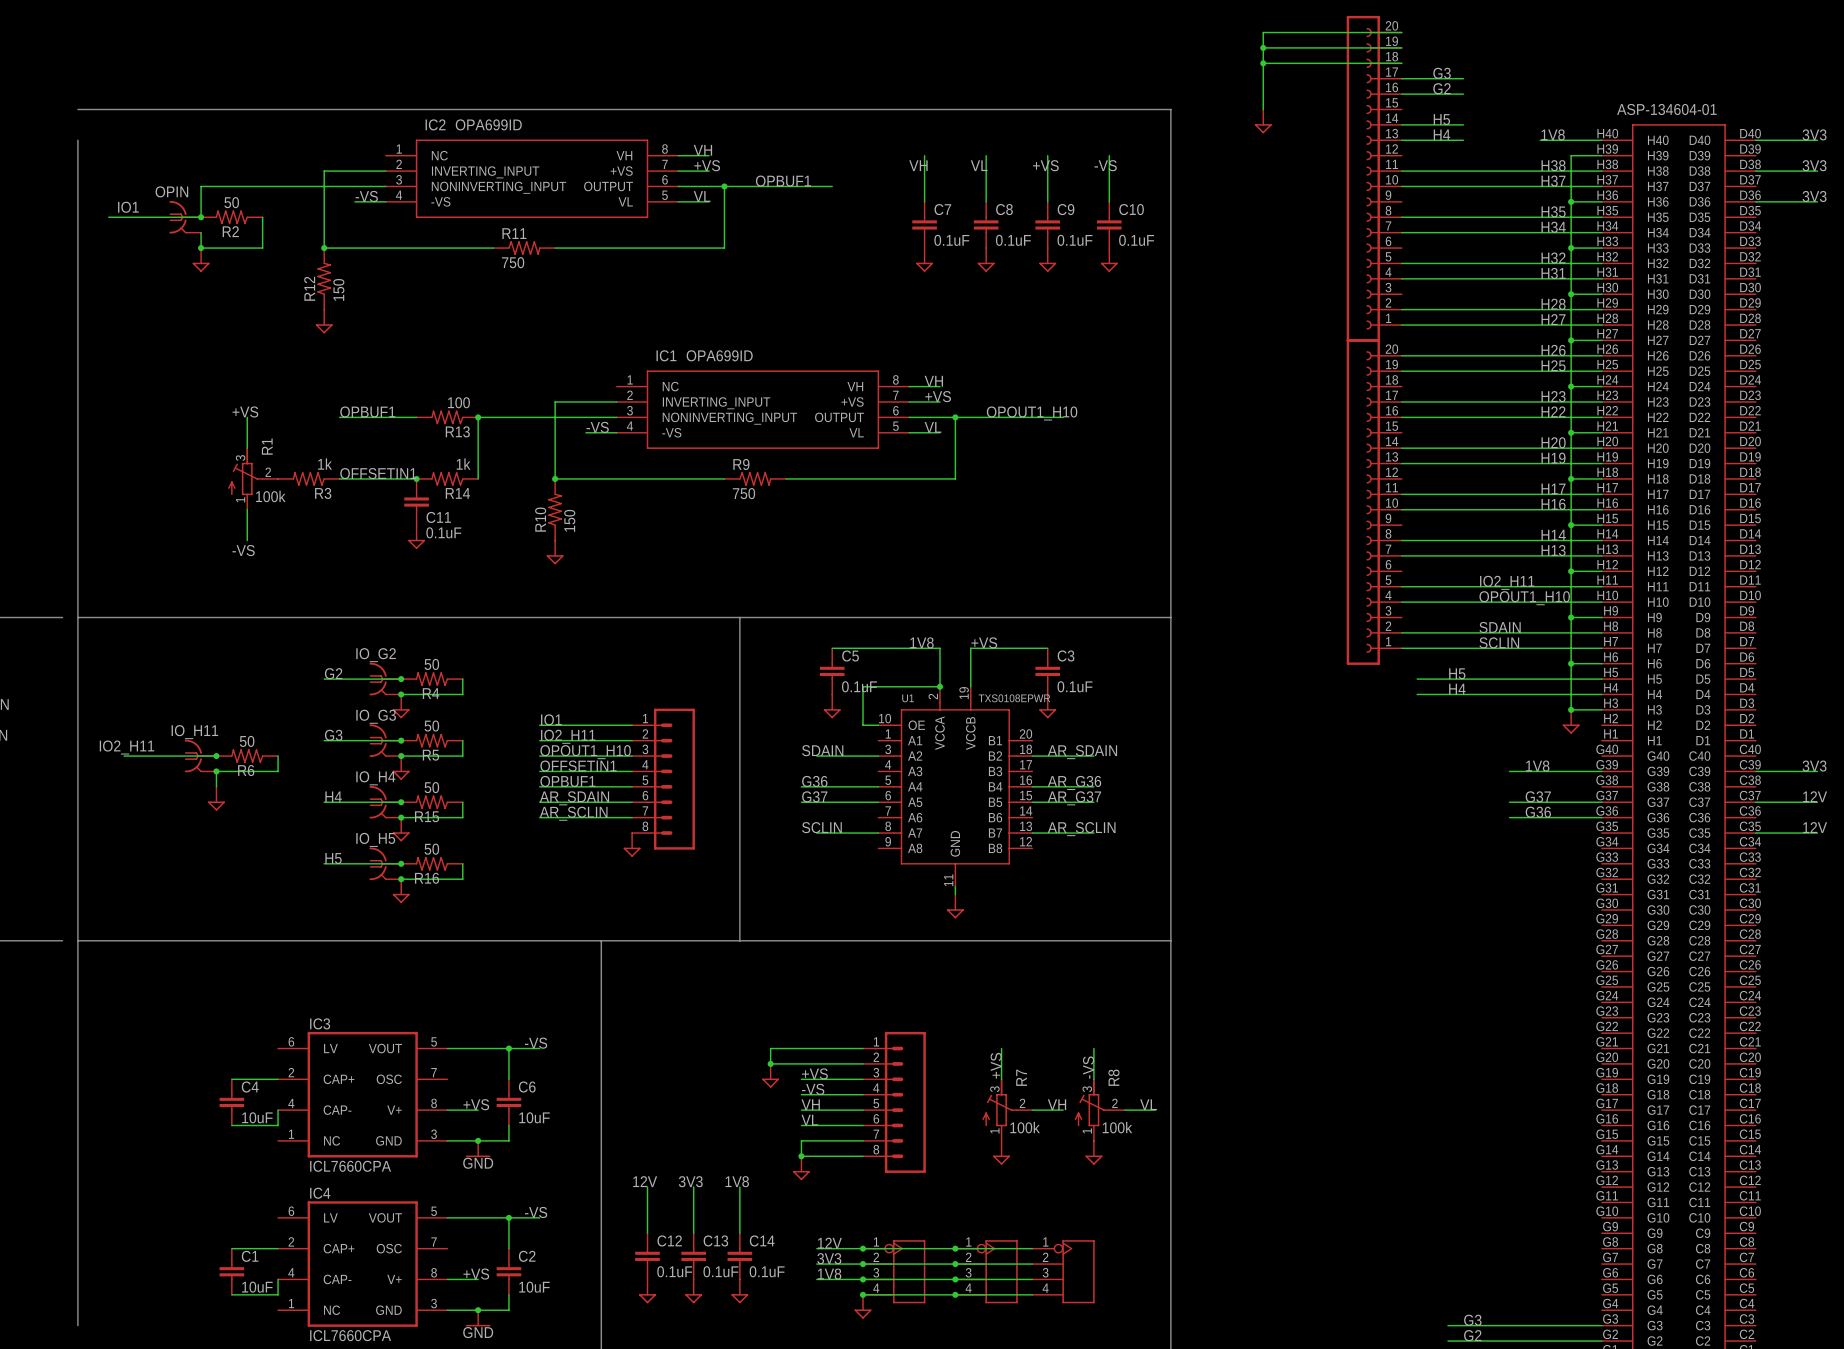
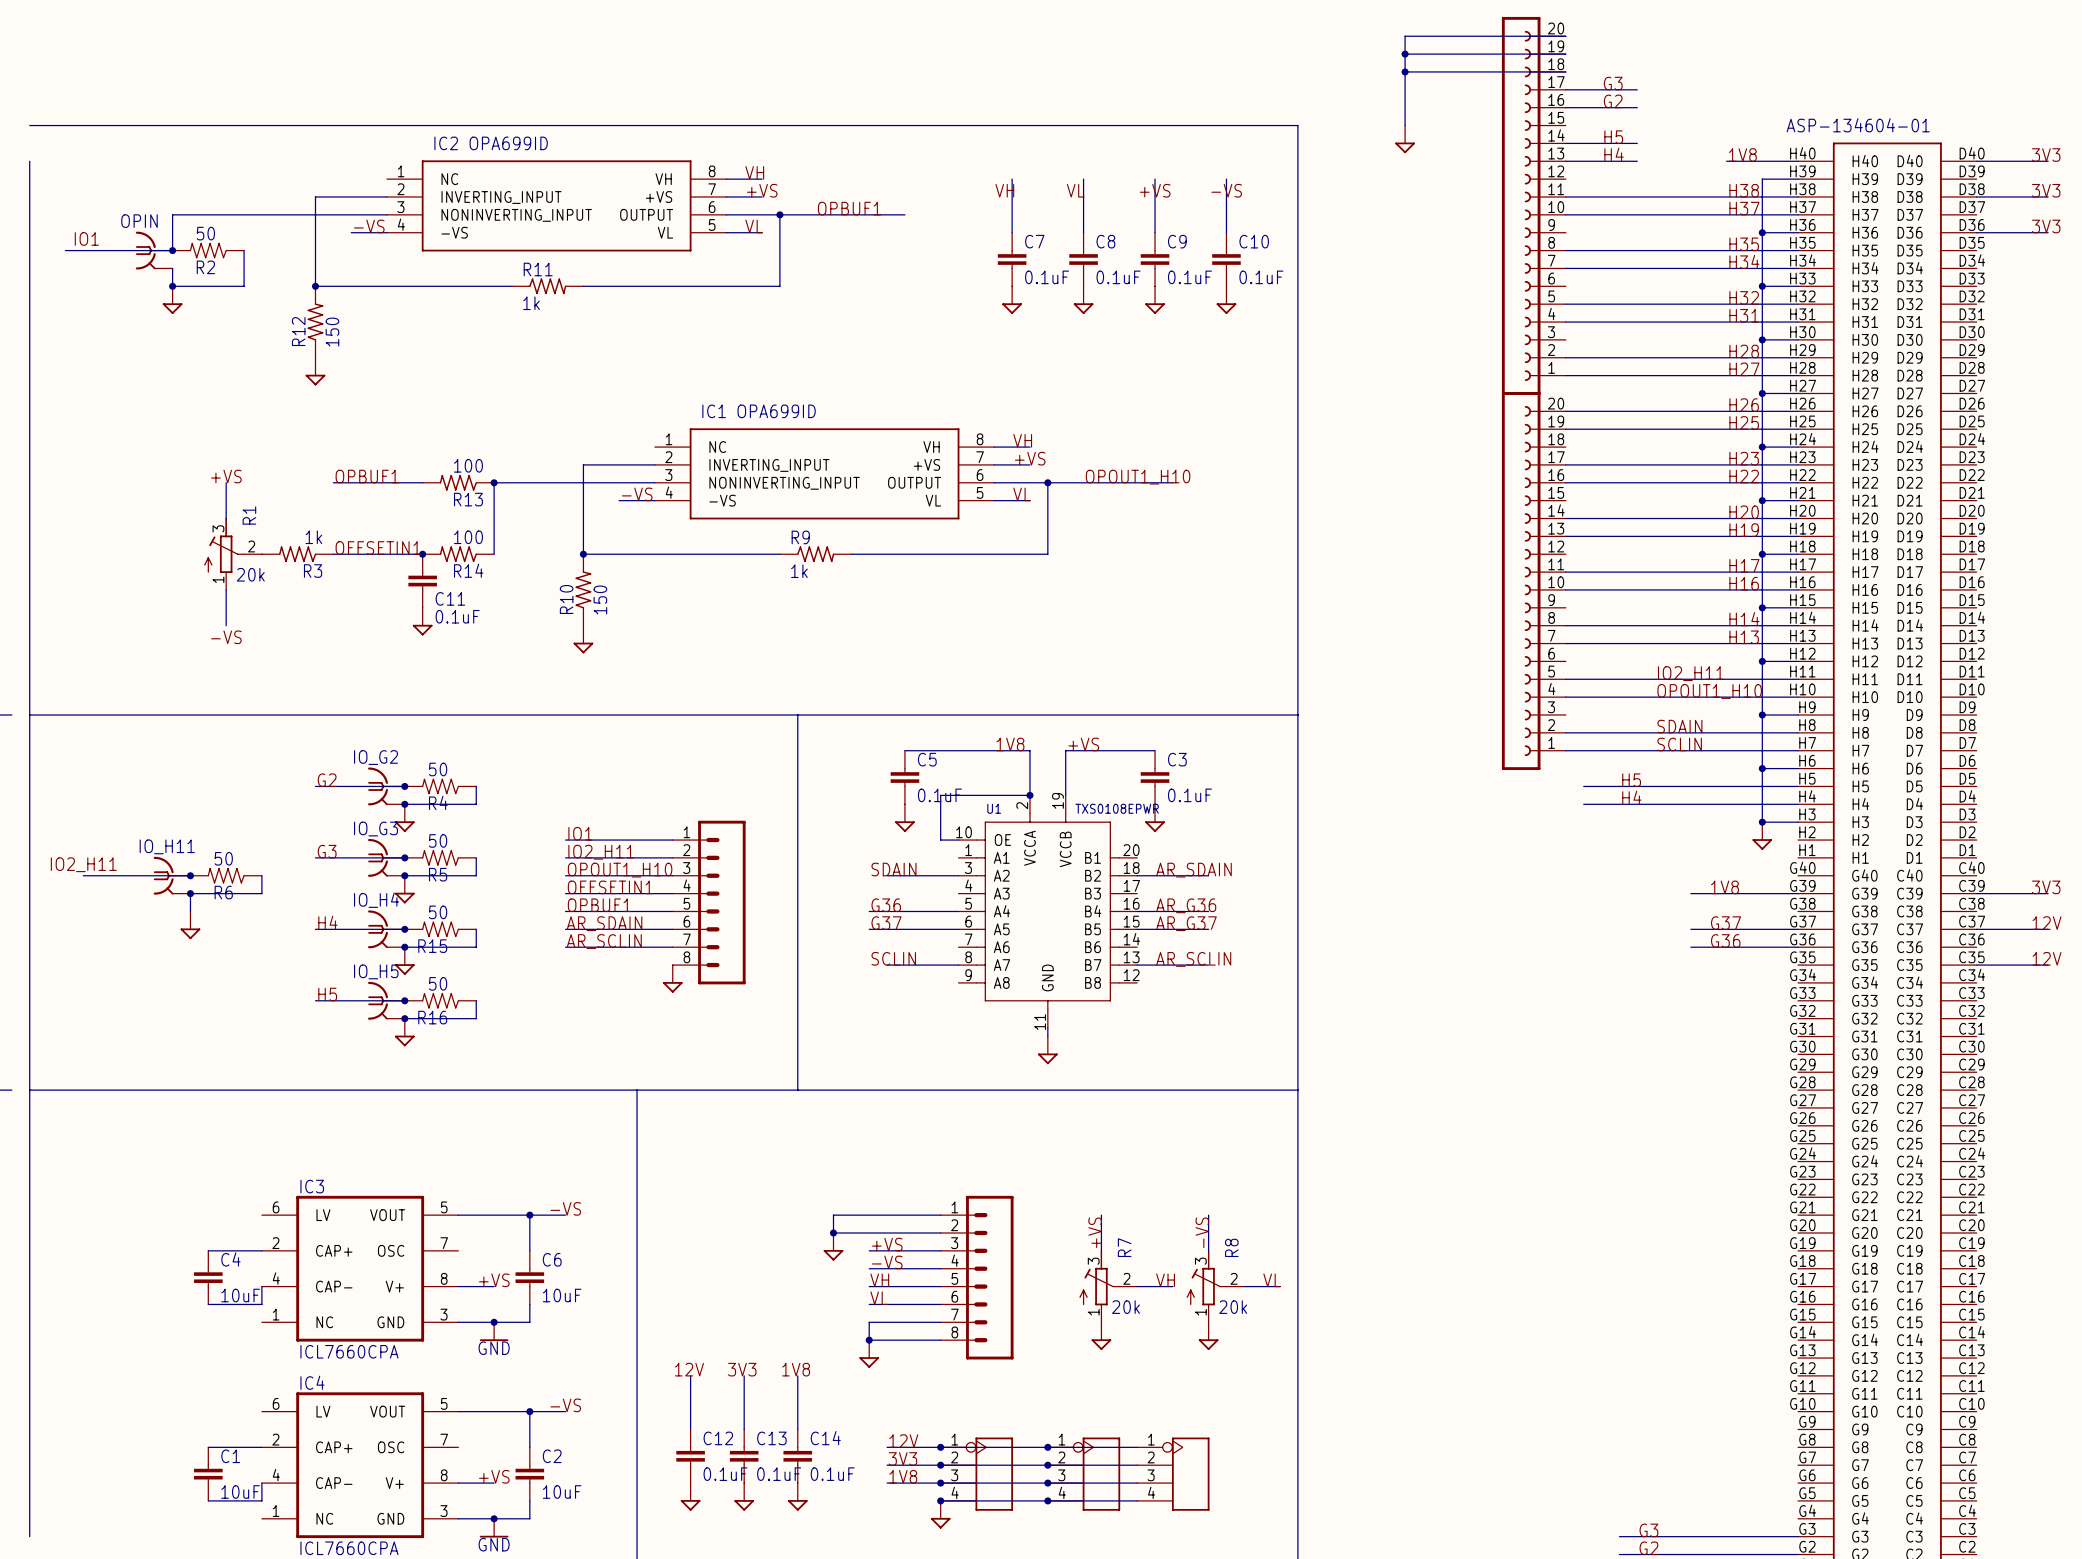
R11 value: 750 (513, 262) -> 1k (531, 303)
R14 value: 1k (463, 464) -> 100 (468, 537)
R9 value: 750 (744, 493) -> 1k (799, 571)
R1 value: 100k (270, 496) -> 20k (250, 574)
R7 value: 100k (1025, 1127) -> 20k (1126, 1307)
R8 value: 100k (1117, 1127) -> 20k (1233, 1307)

